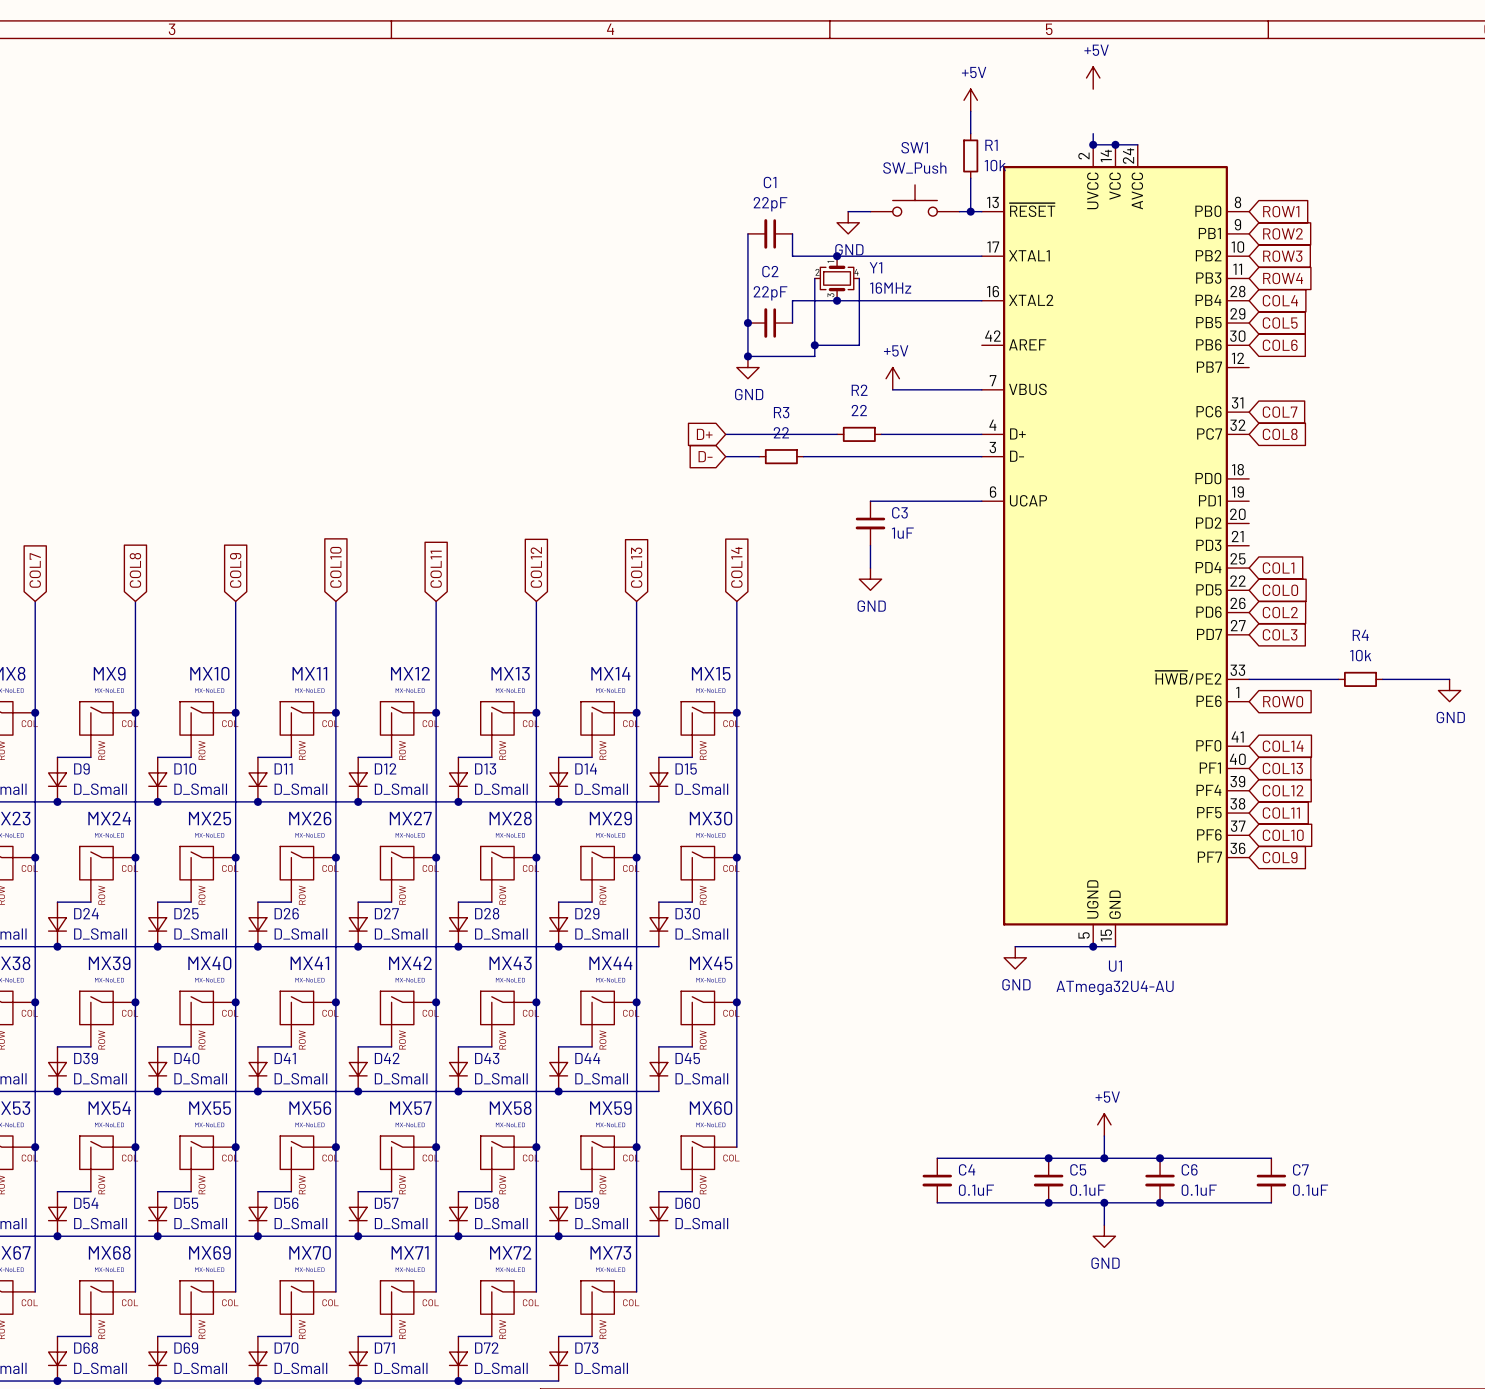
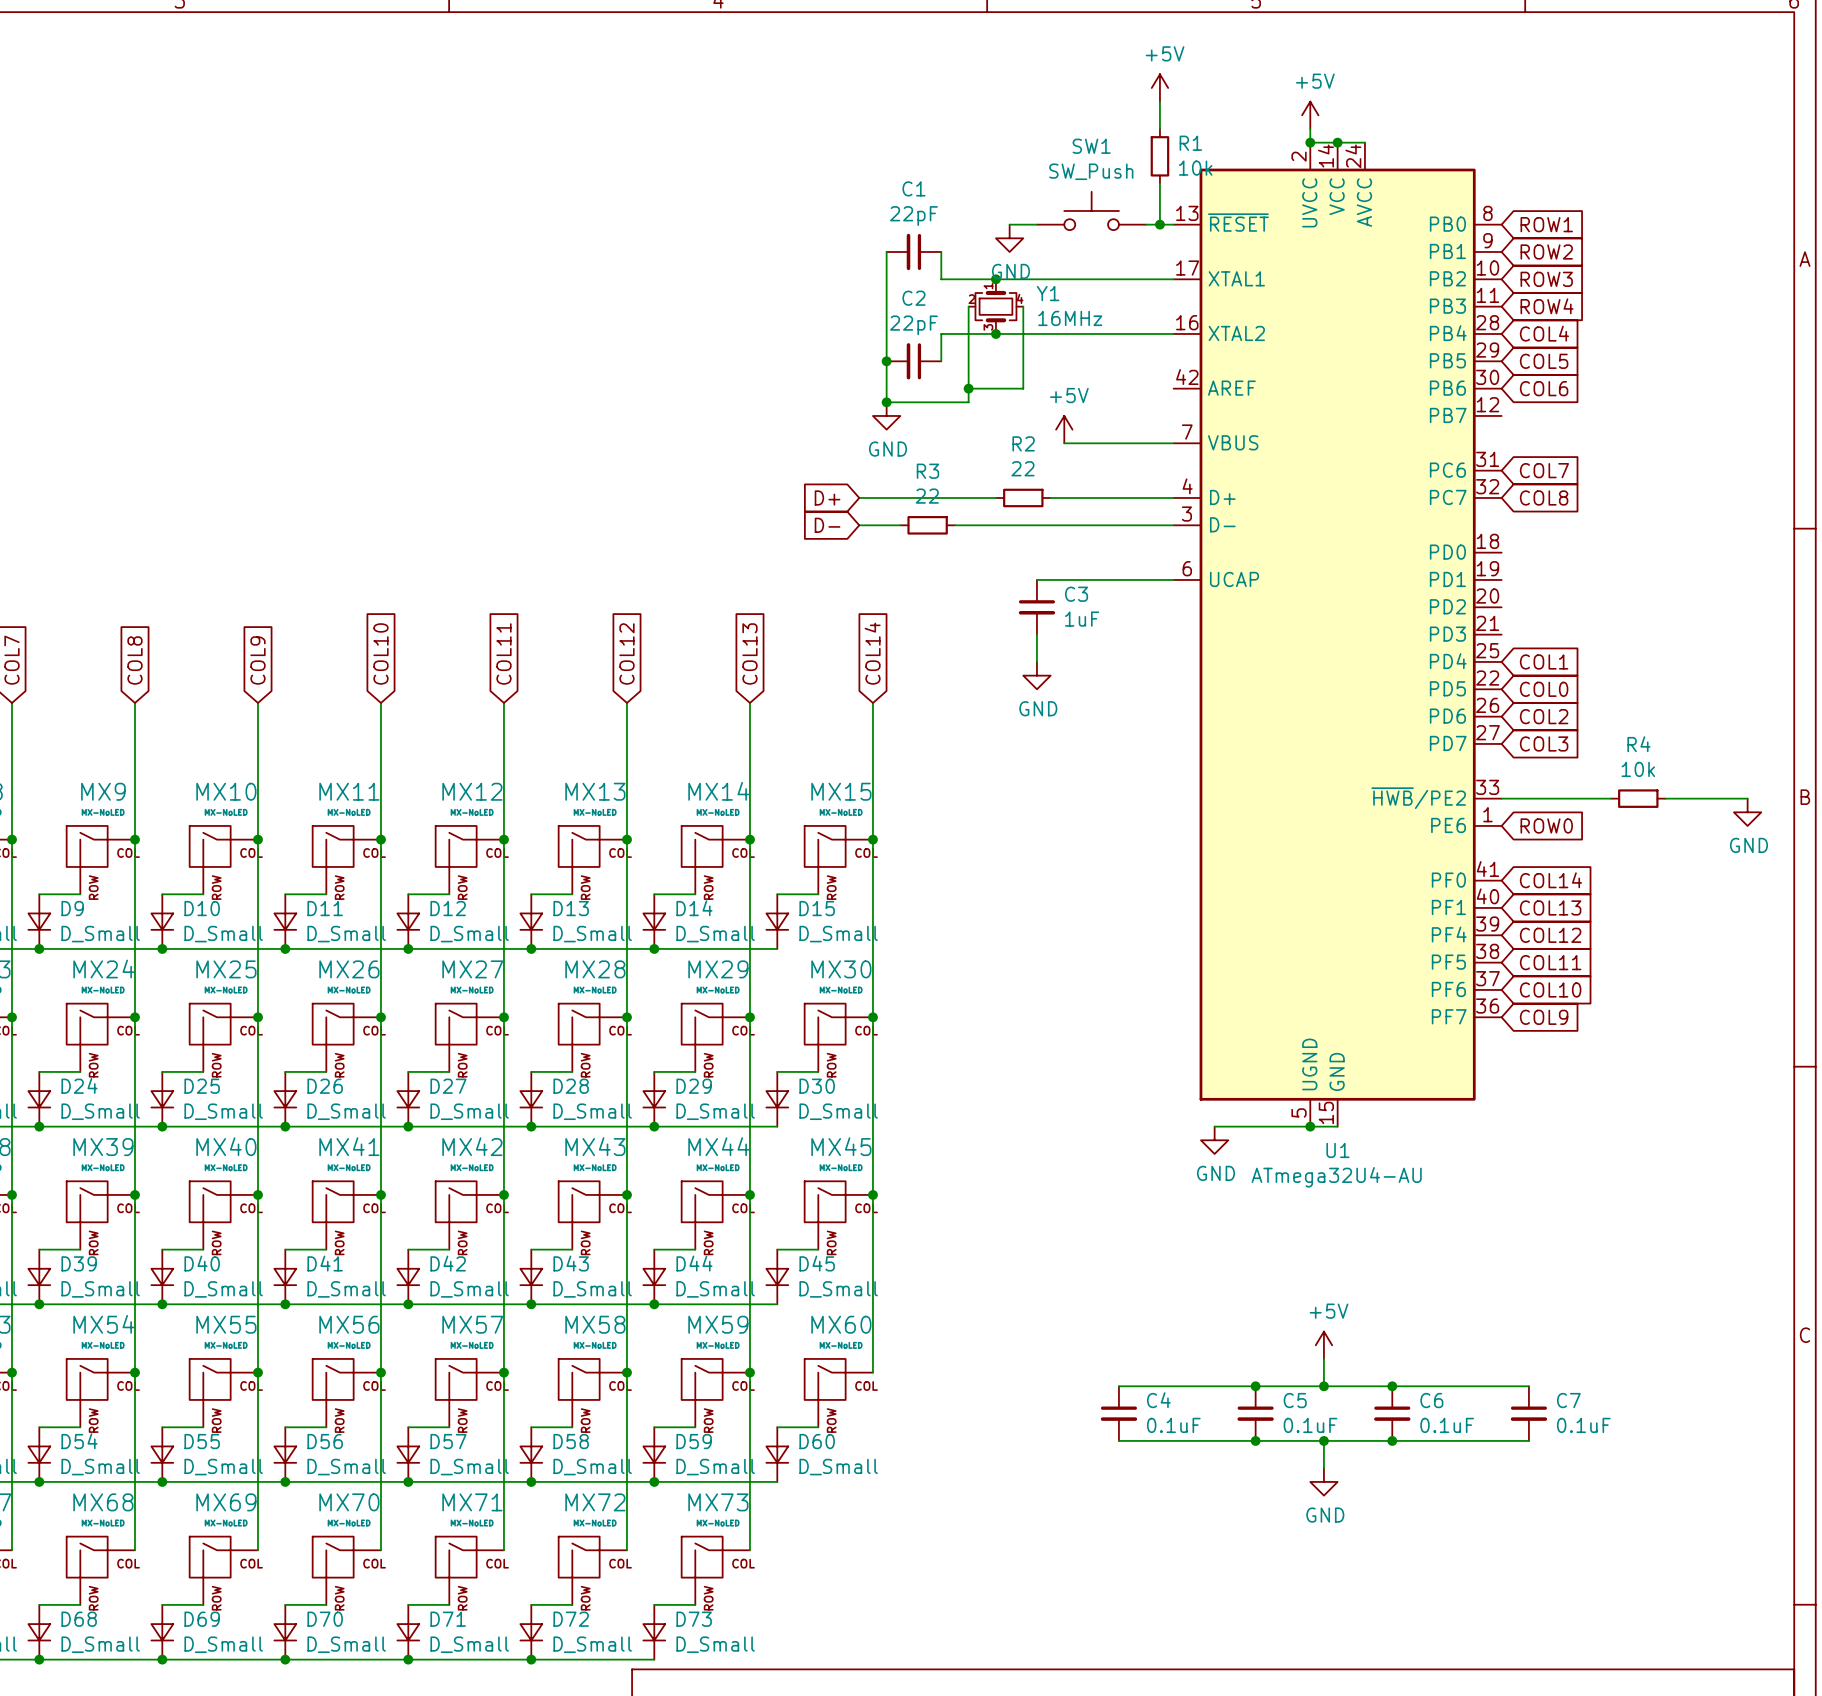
power symbol position: +5V (1093, 78) -> +5V (1310, 115)

